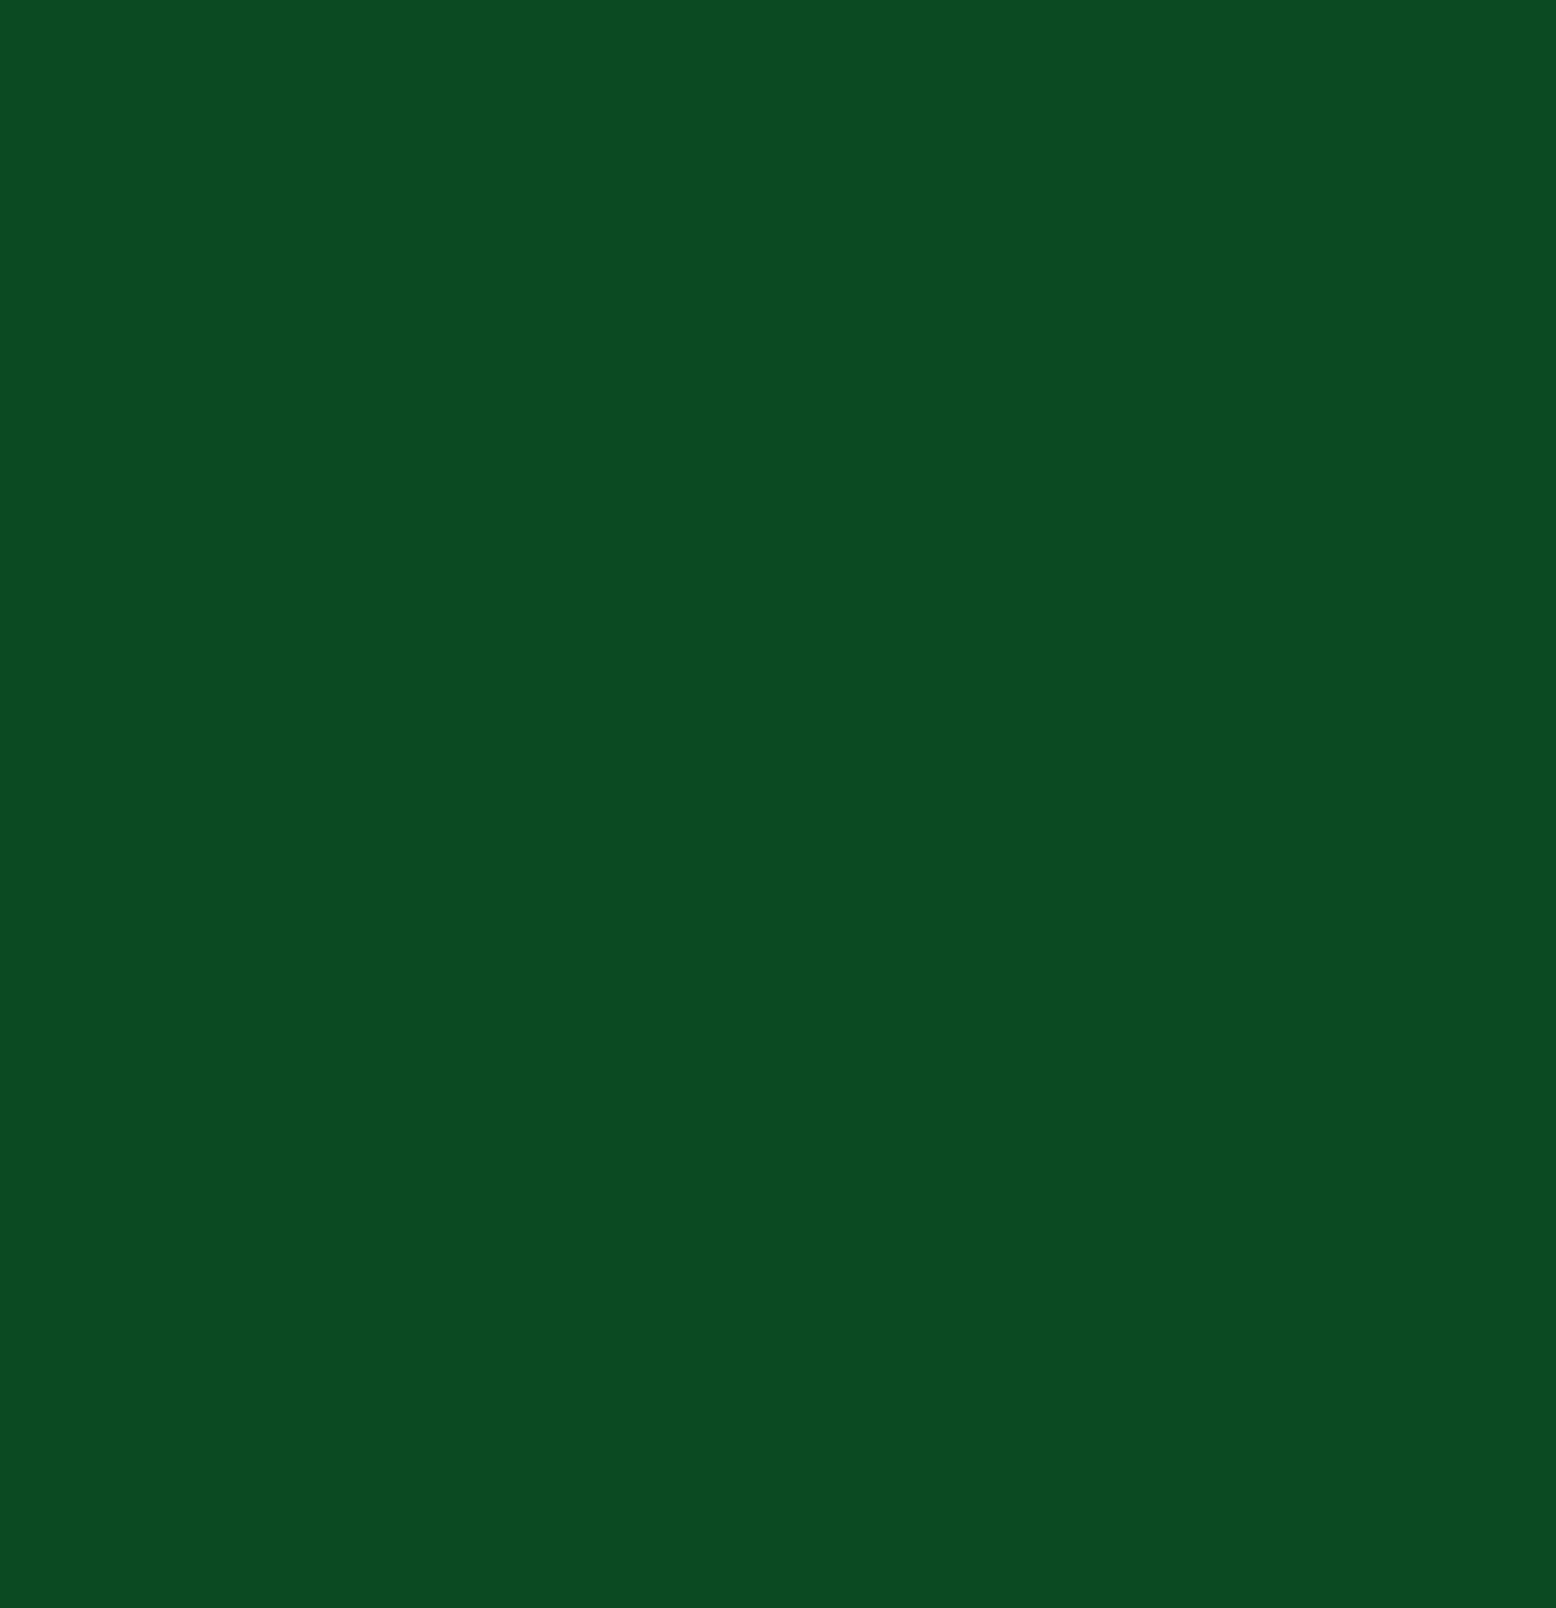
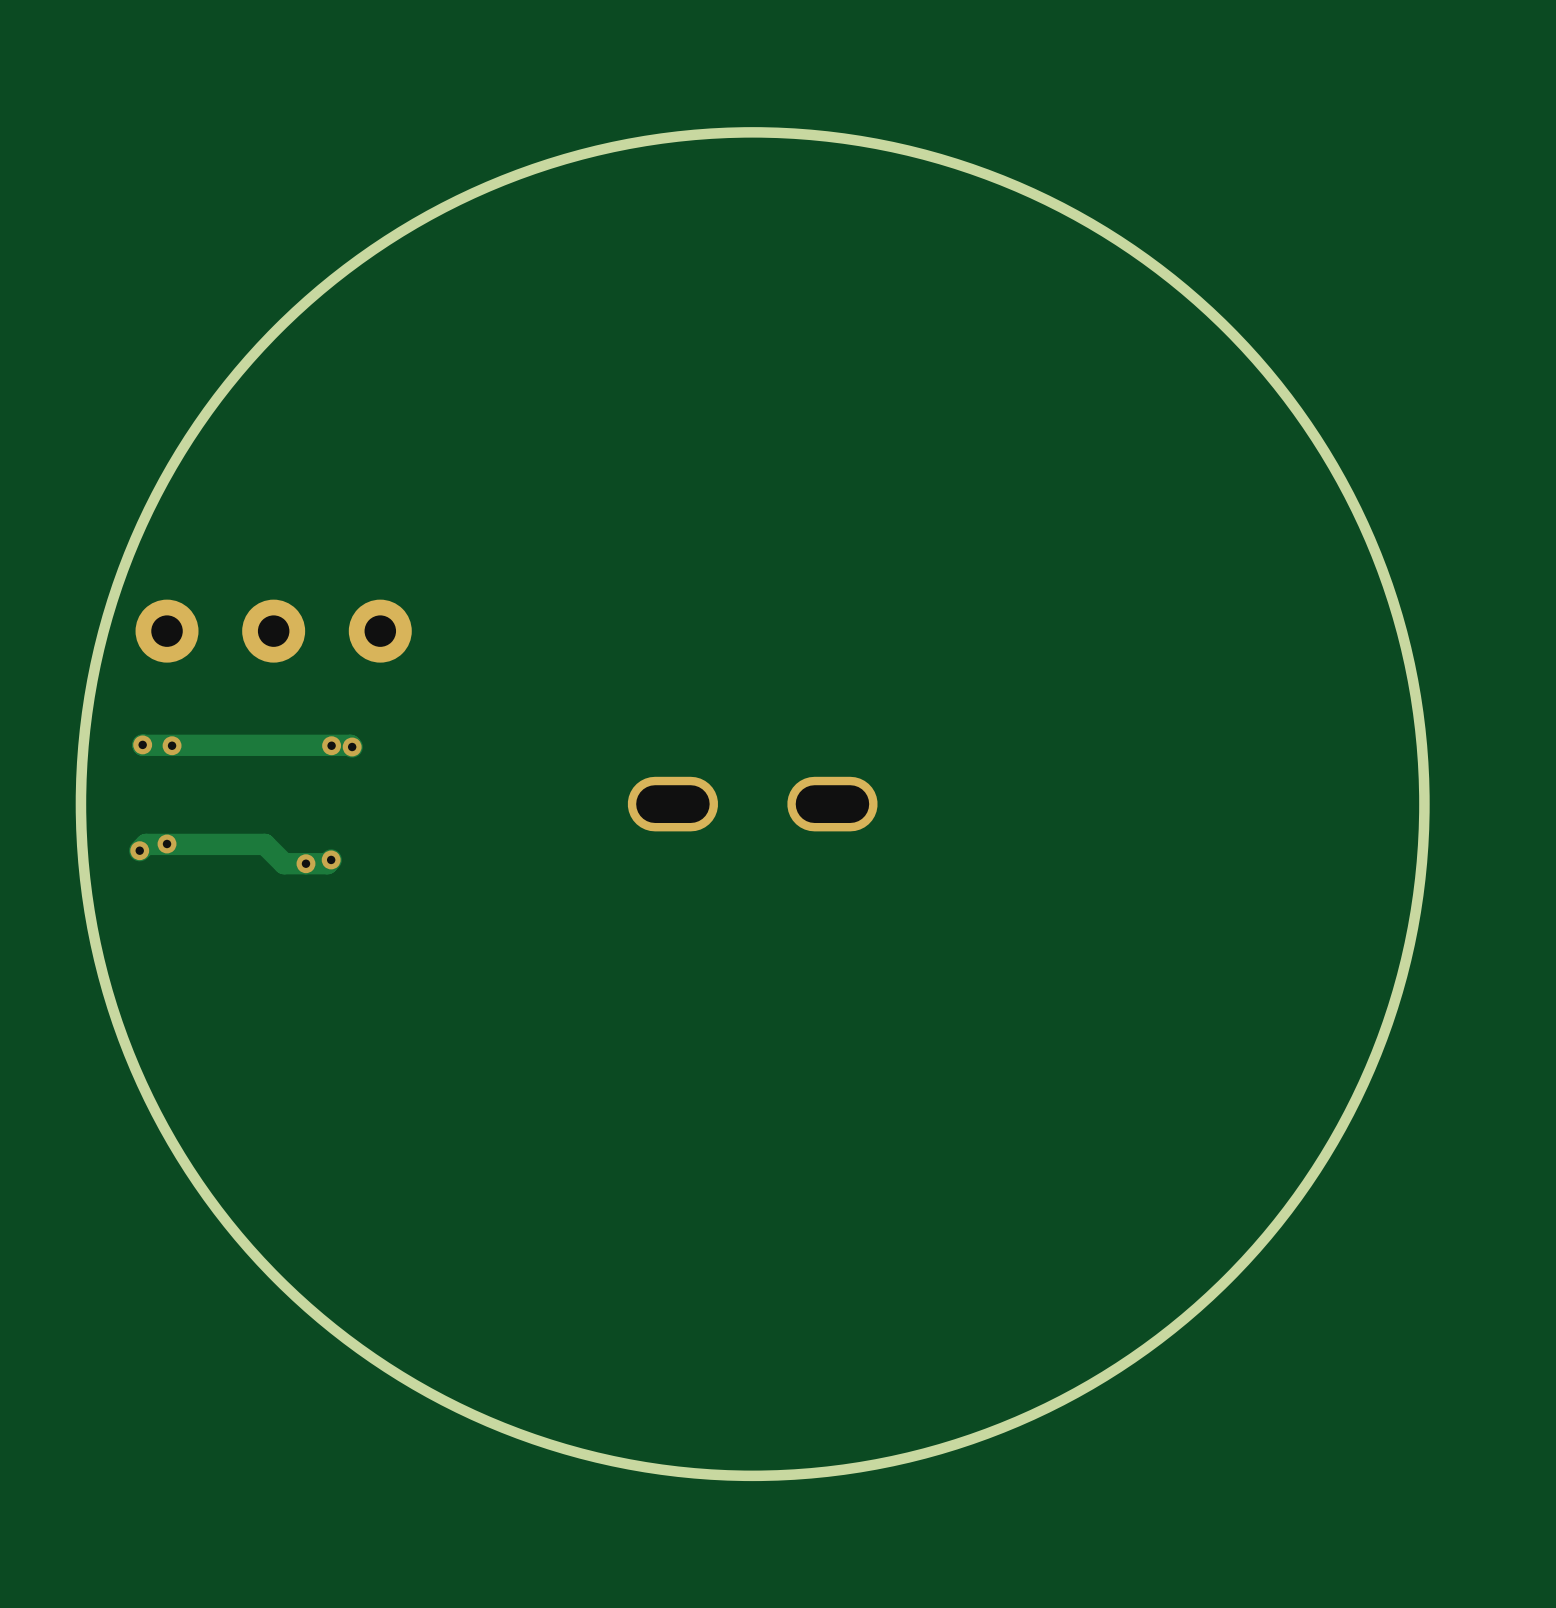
round board edge: none -> [75, 127, 1430, 1482]
part: none -> (167, 631)
part: none -> (273, 631)
part: none -> (380, 631)
via: none -> (142, 744)
track: none -> (143, 745) (350, 745) (352, 747)
via: none -> (172, 745)
via: none -> (331, 745)
via: none -> (352, 747)
part: none -> (672, 804)
part: none -> (832, 804)
via: none -> (167, 843)
track: none -> (139, 850) (146, 844) (264, 844) (284, 863) (327, 863) (331, 859)
via: none -> (139, 850)
via: none -> (331, 859)
via: none -> (305, 863)

